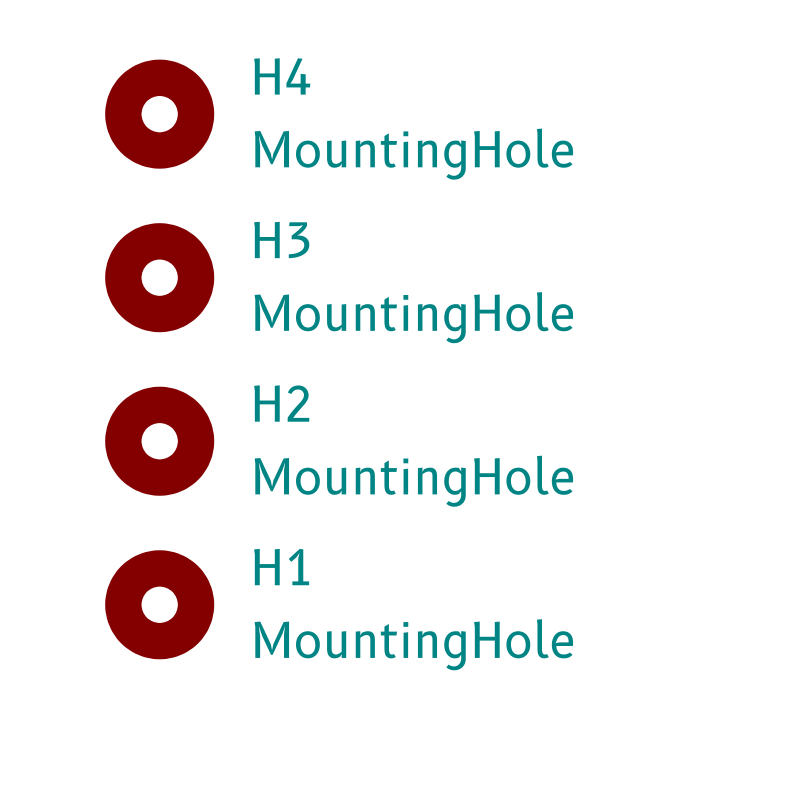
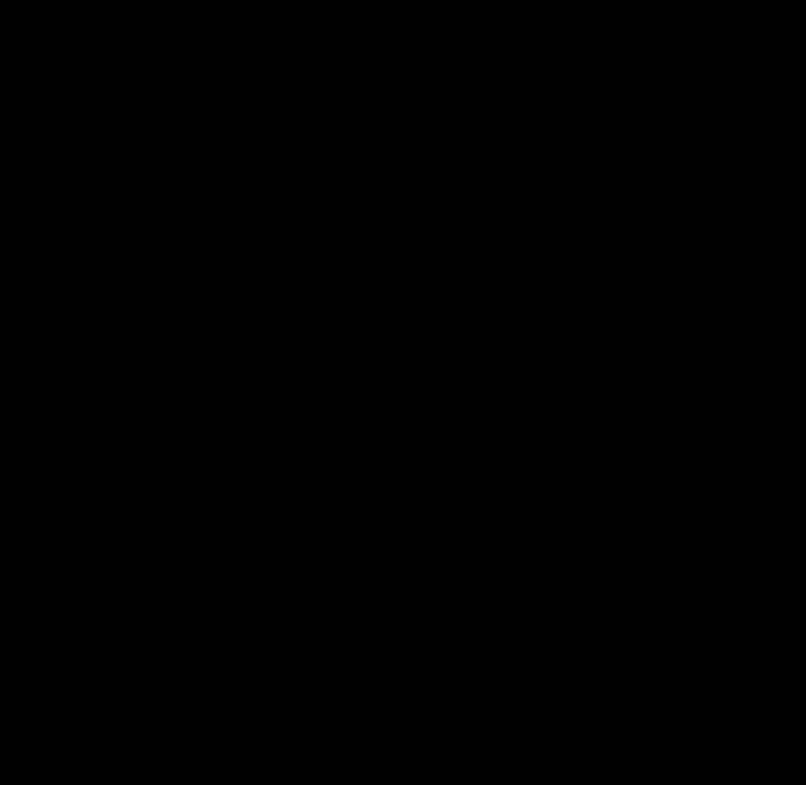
H4: MountingHole (159, 114) -> none
H3: MountingHole (159, 277) -> none
H2: MountingHole (159, 441) -> none
H1: MountingHole (159, 604) -> none

